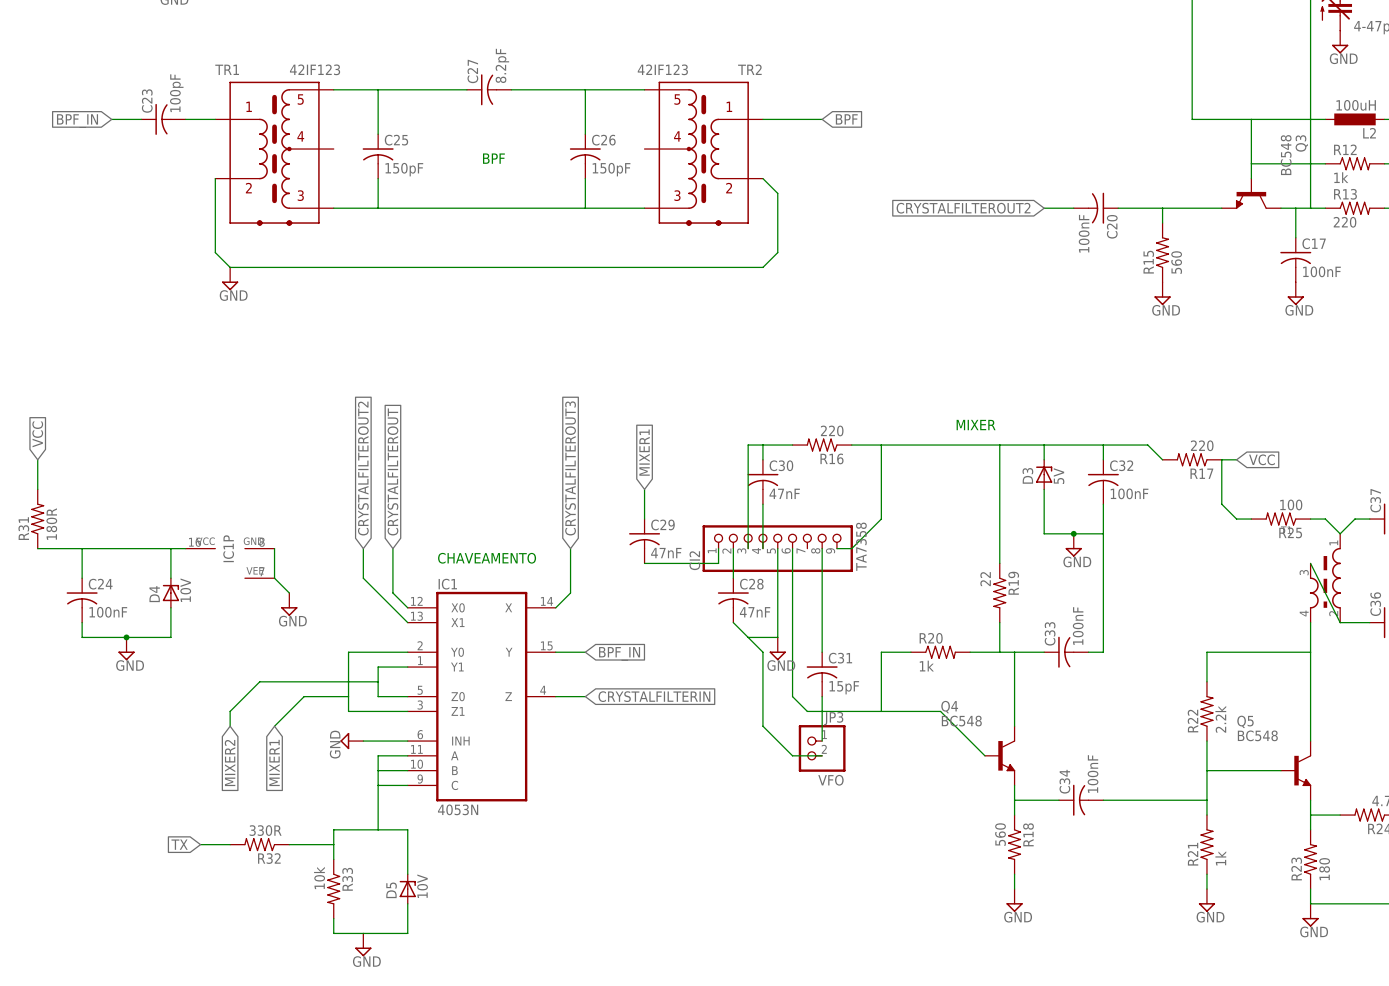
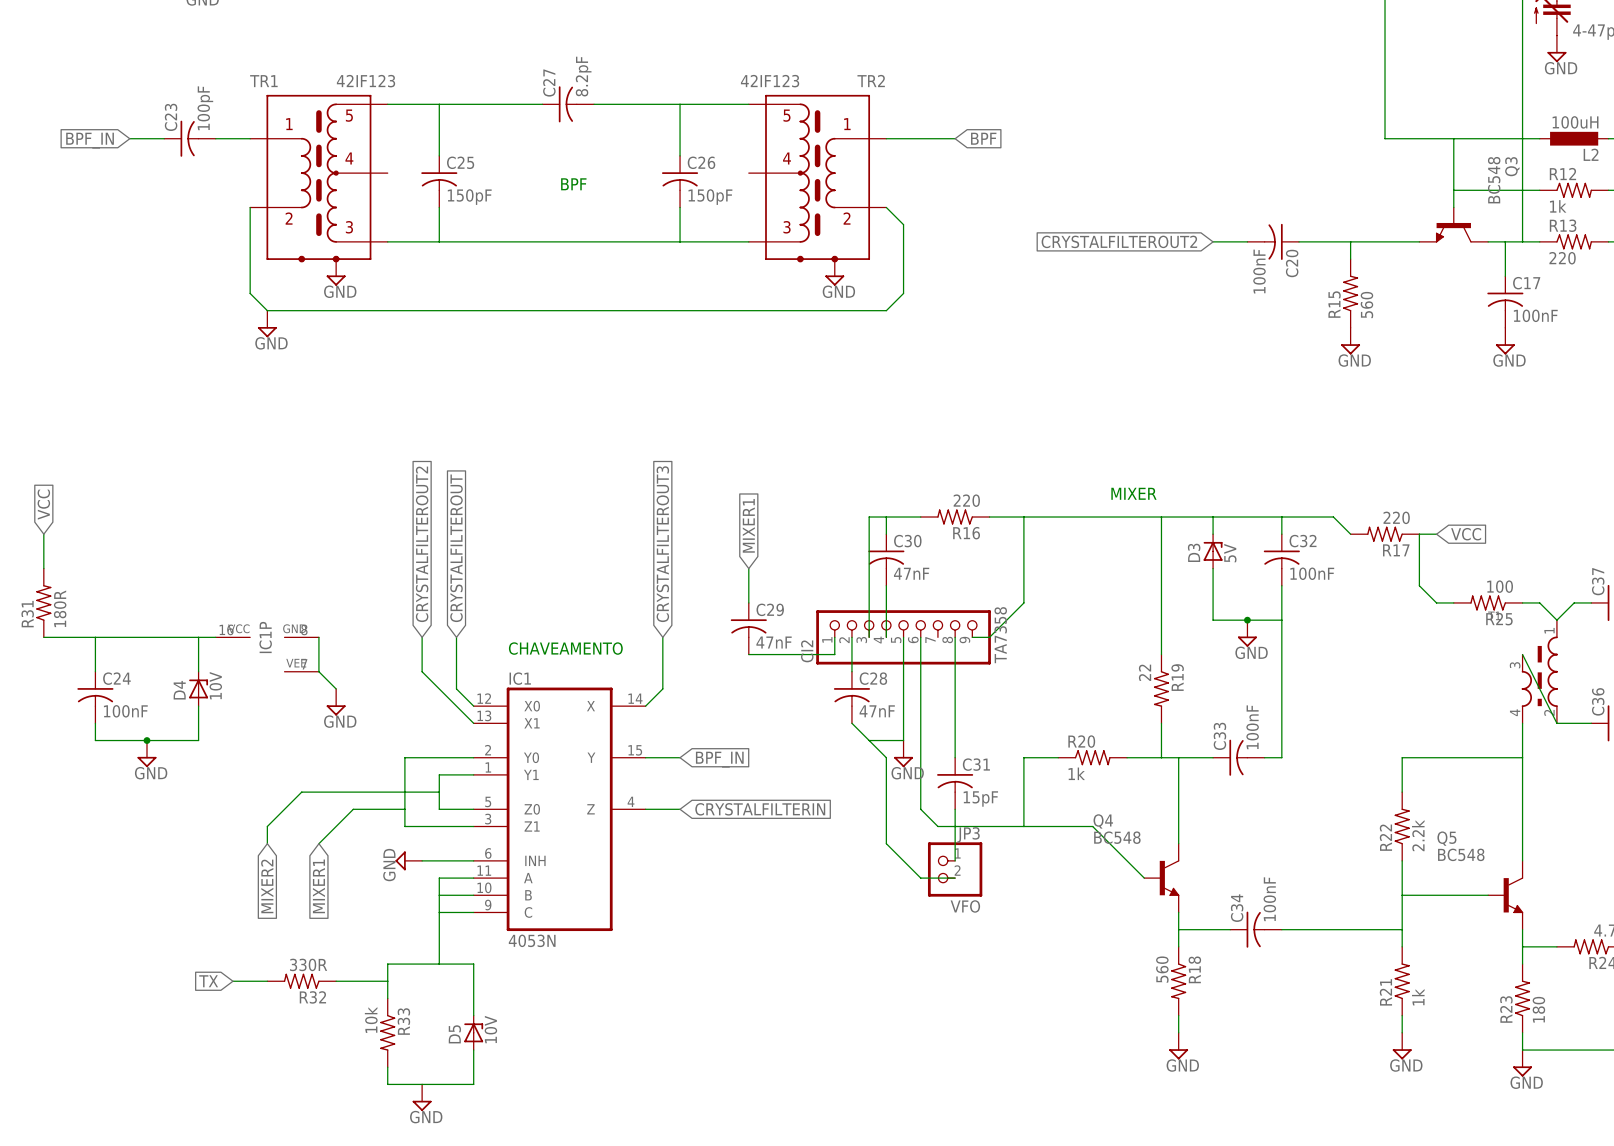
power symbol: none -> GND (336, 272)
power symbol: none -> GND (834, 272)

